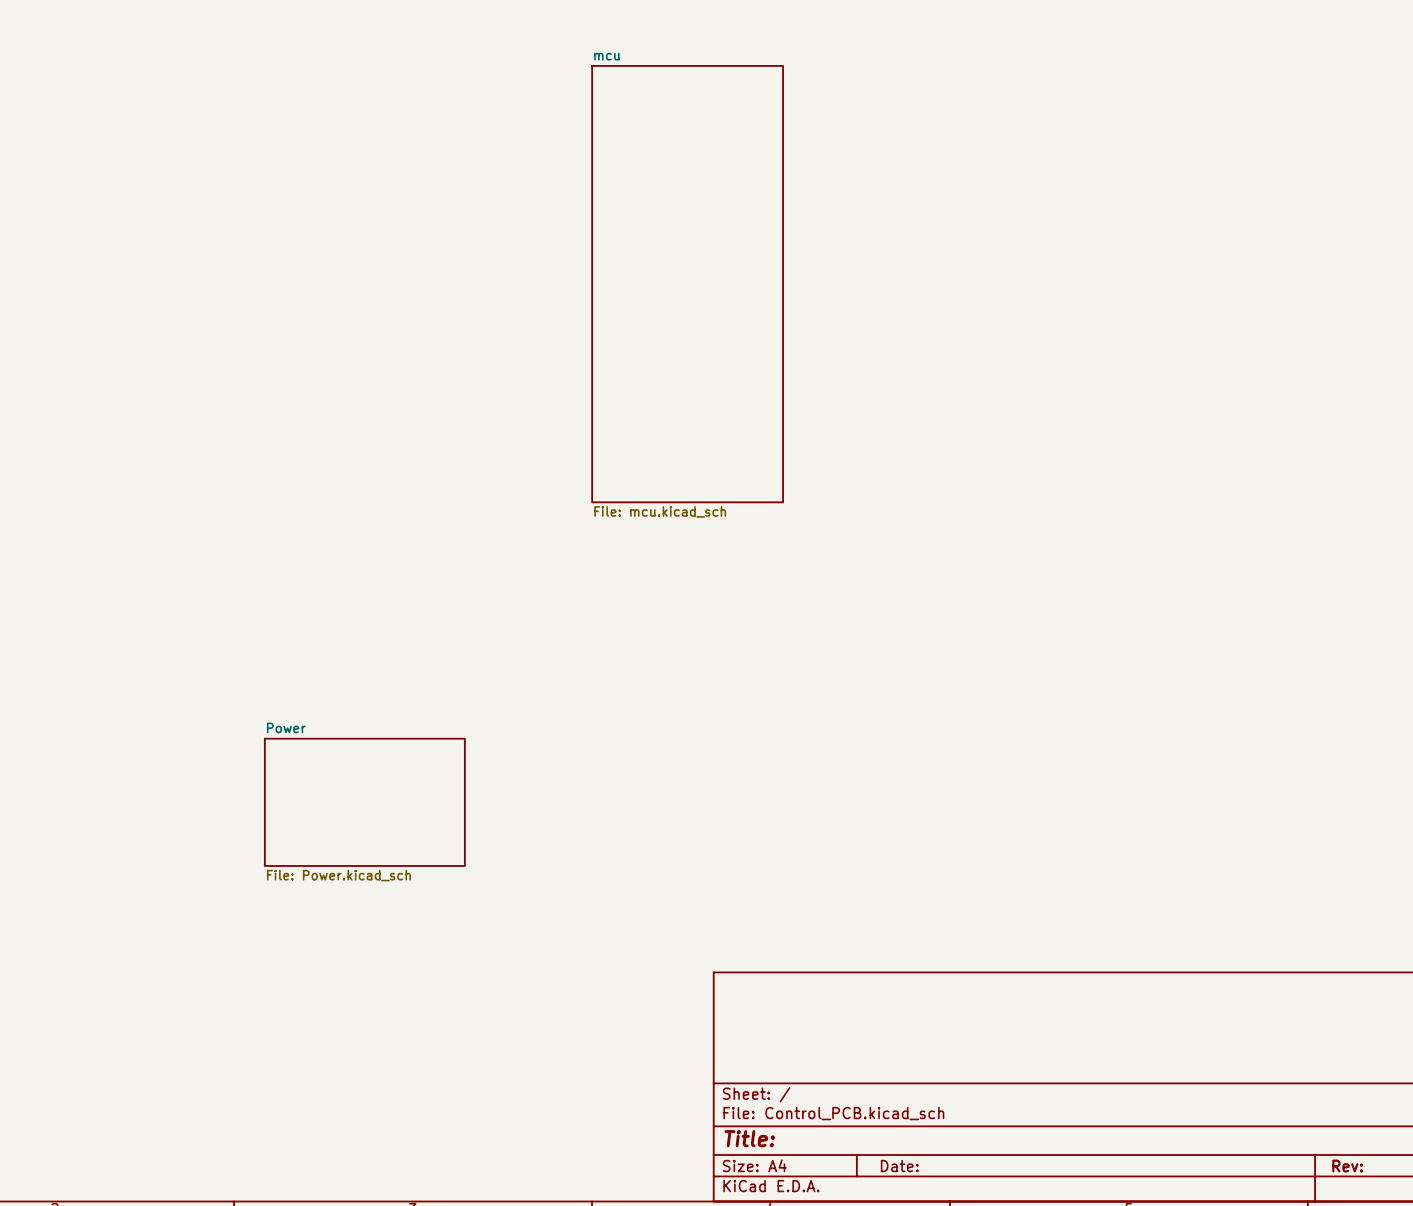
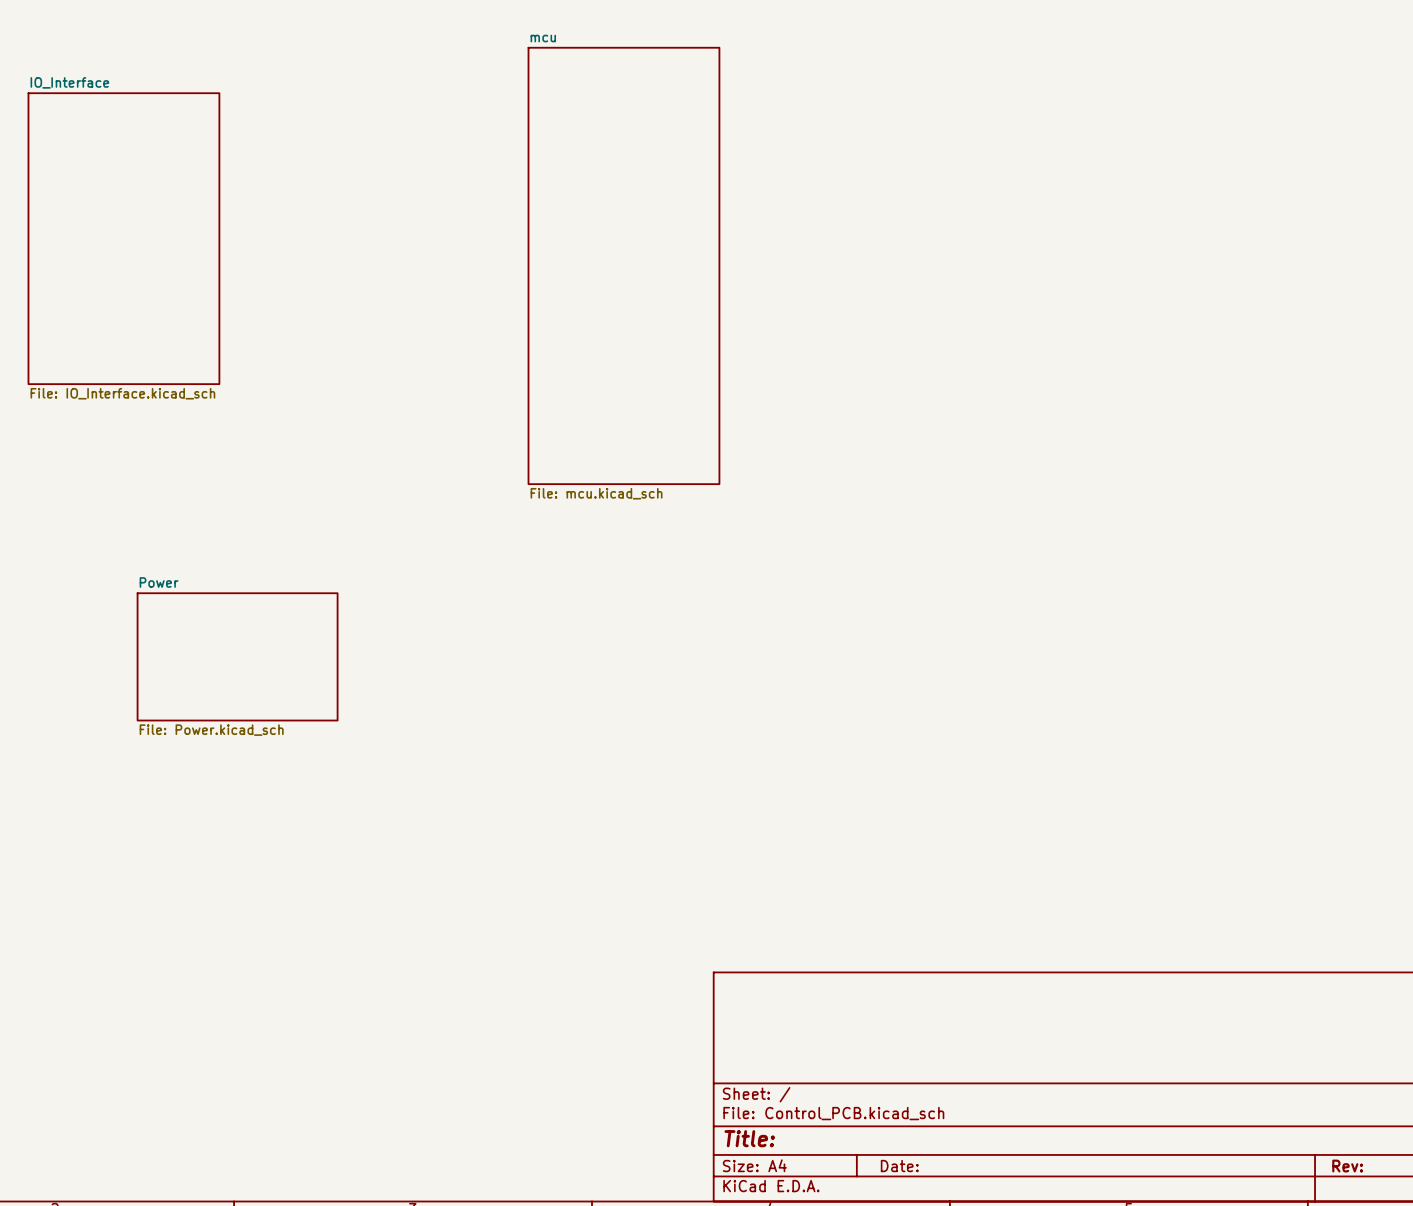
sheet IO_Interface: none -> File: IO_Interface.kicad_sch (123, 238)
sheet mcu position: (687, 284) -> (623, 265)
sheet Power: none -> File: Power.kicad_sch (237, 656)
sheet Power: File: Power.kicad_sch (364, 802) -> none

